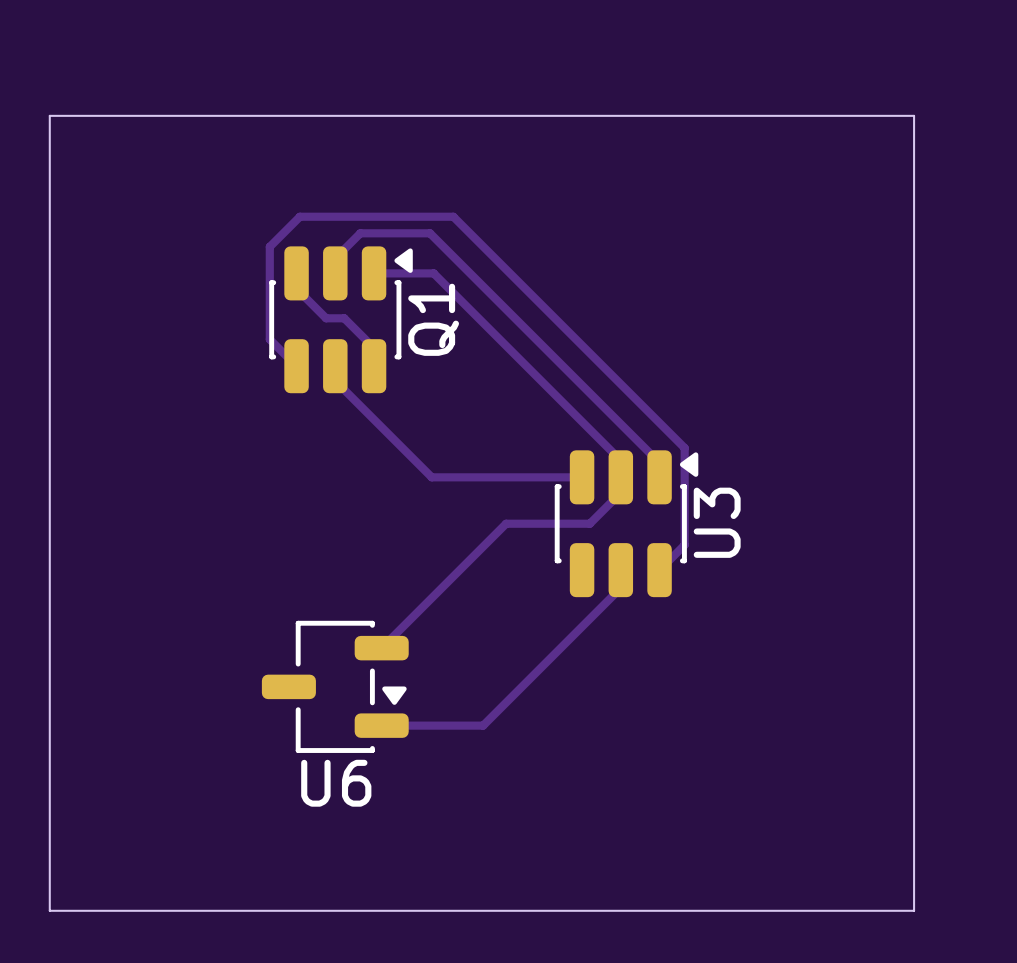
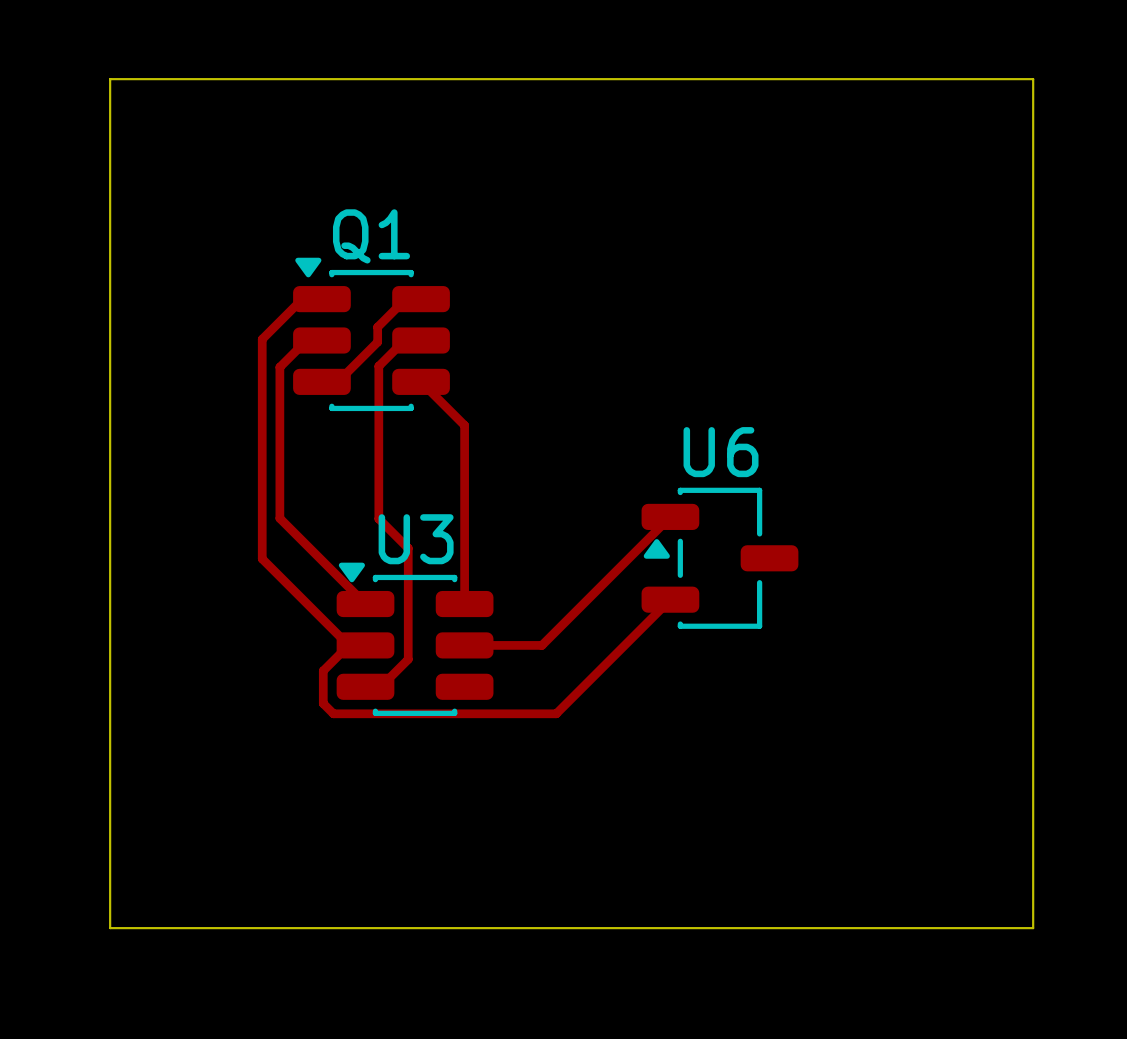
track: (296, 273) (296, 288) (326, 318) (344, 318) (374, 348) (374, 366) -> none
track: (335, 273) (335, 258) (360, 233) (430, 233) (659, 462) (659, 477) -> none
track: (374, 273) (433, 273) (620, 460) (620, 492) (589, 523) (506, 523) (381, 648) -> none
Q1 rotation: 0° (341, 319) -> 90° counterclockwise (371, 334)
track: none -> (321, 299) (302, 299) (262, 339) (262, 558) (348, 645)
track: none -> (421, 299) (405, 299) (377, 327) (377, 342) (337, 381) (321, 381)
track: none -> (321, 340) (306, 340) (279, 367) (279, 518) (365, 604)
track: none -> (421, 340) (404, 340) (378, 366) (378, 518) (408, 548) (408, 659) (380, 686) (365, 686)
track: (296, 366) (269, 339) (269, 246) (299, 216) (453, 216) (684, 448) (684, 545) (659, 570) -> none
track: (335, 366) (335, 380) (431, 477) (582, 477) -> none
track: none -> (421, 381) (464, 425) (464, 604)
U3 rotation: 0° (626, 523) -> 90° counterclockwise (415, 639)
U3 position: (626, 523) -> (415, 639)
track: none -> (670, 516) (541, 645) (464, 645)
track: (620, 570) (620, 587) (483, 725) (381, 725) -> none
track: none -> (670, 599) (556, 713) (333, 713) (323, 703) (323, 670) (348, 645)
U6 rotation: 0° (335, 686) -> 180° (719, 558)
U6 position: (335, 686) -> (719, 558)

